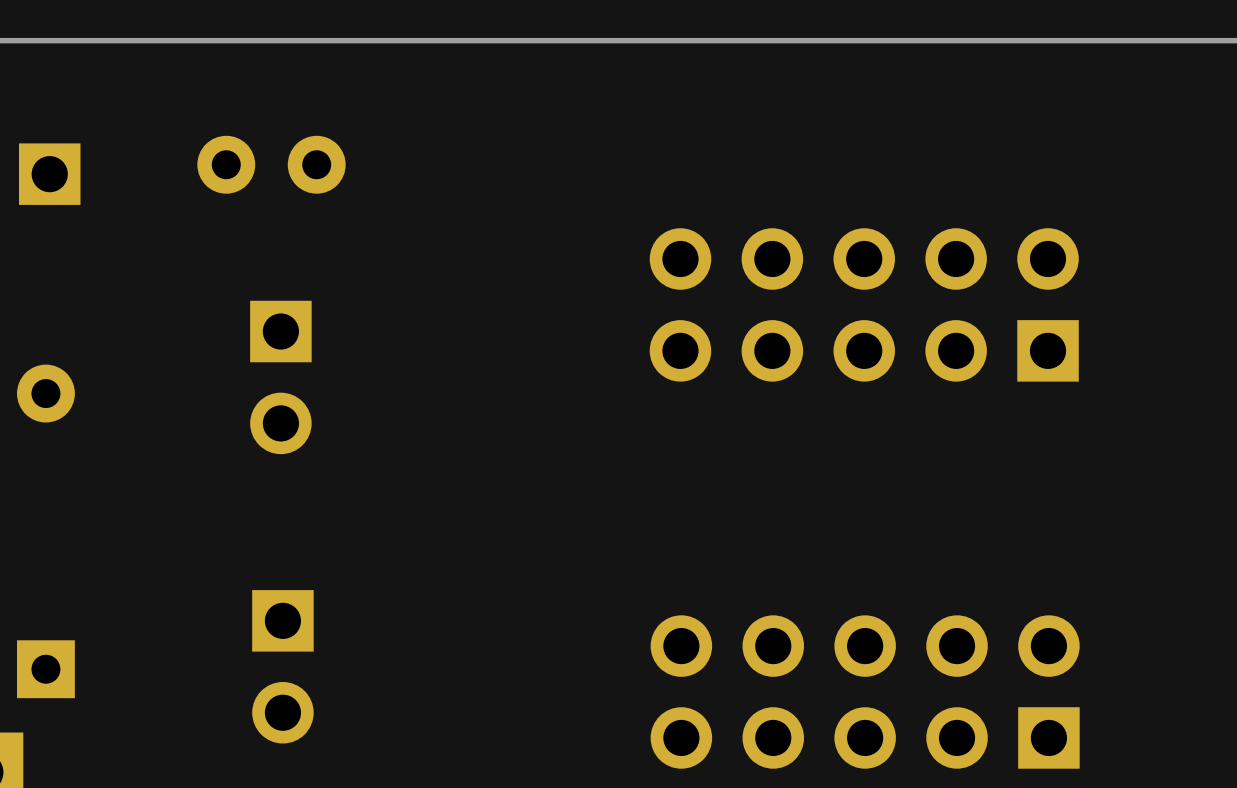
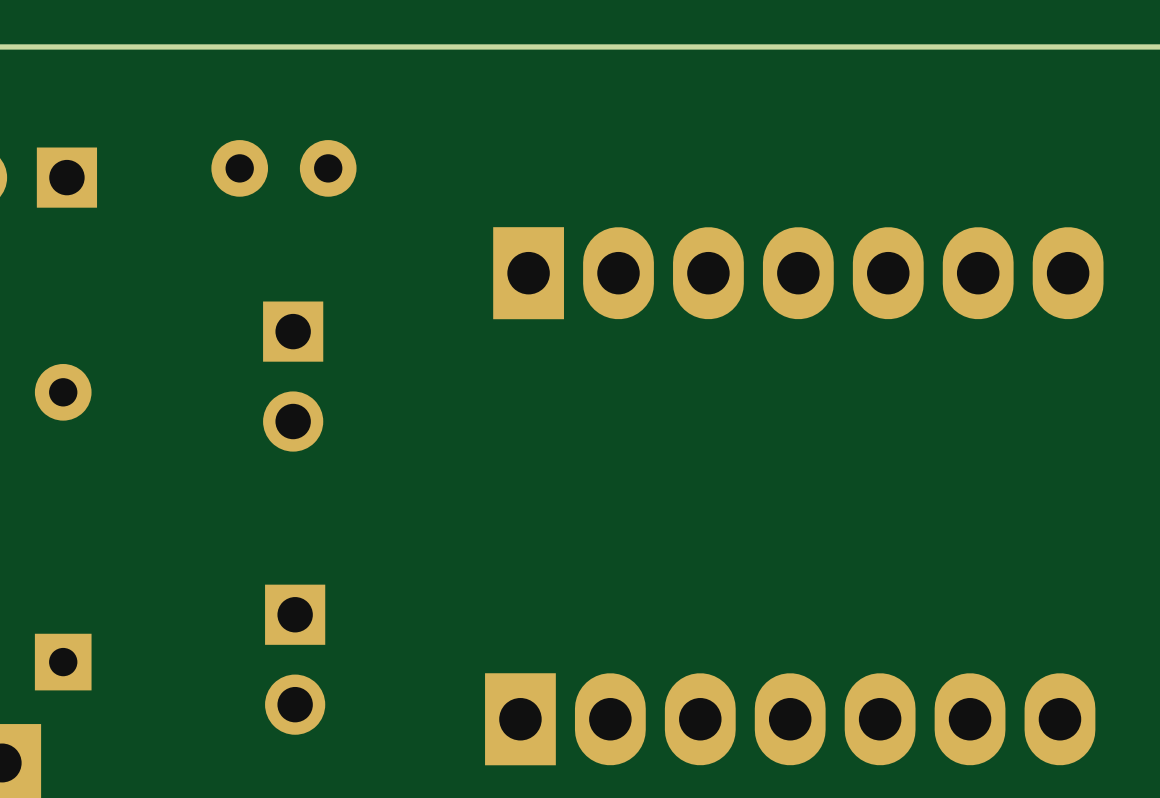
part: none -> (798, 273)
part: (864, 304) -> none
part: (865, 692) -> none
part: none -> (790, 719)

